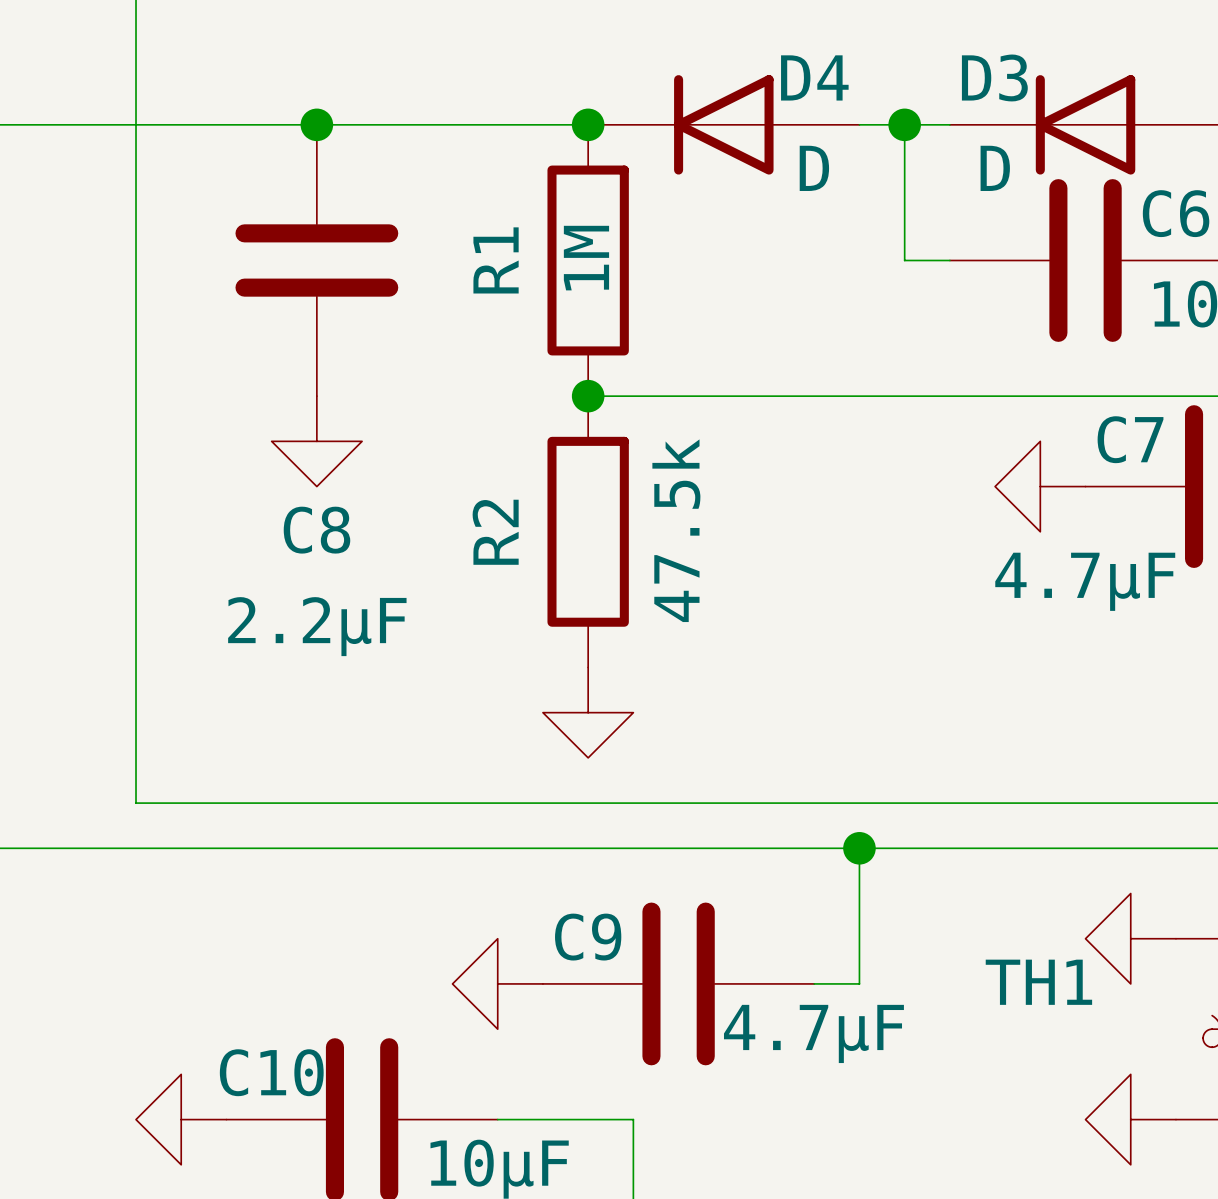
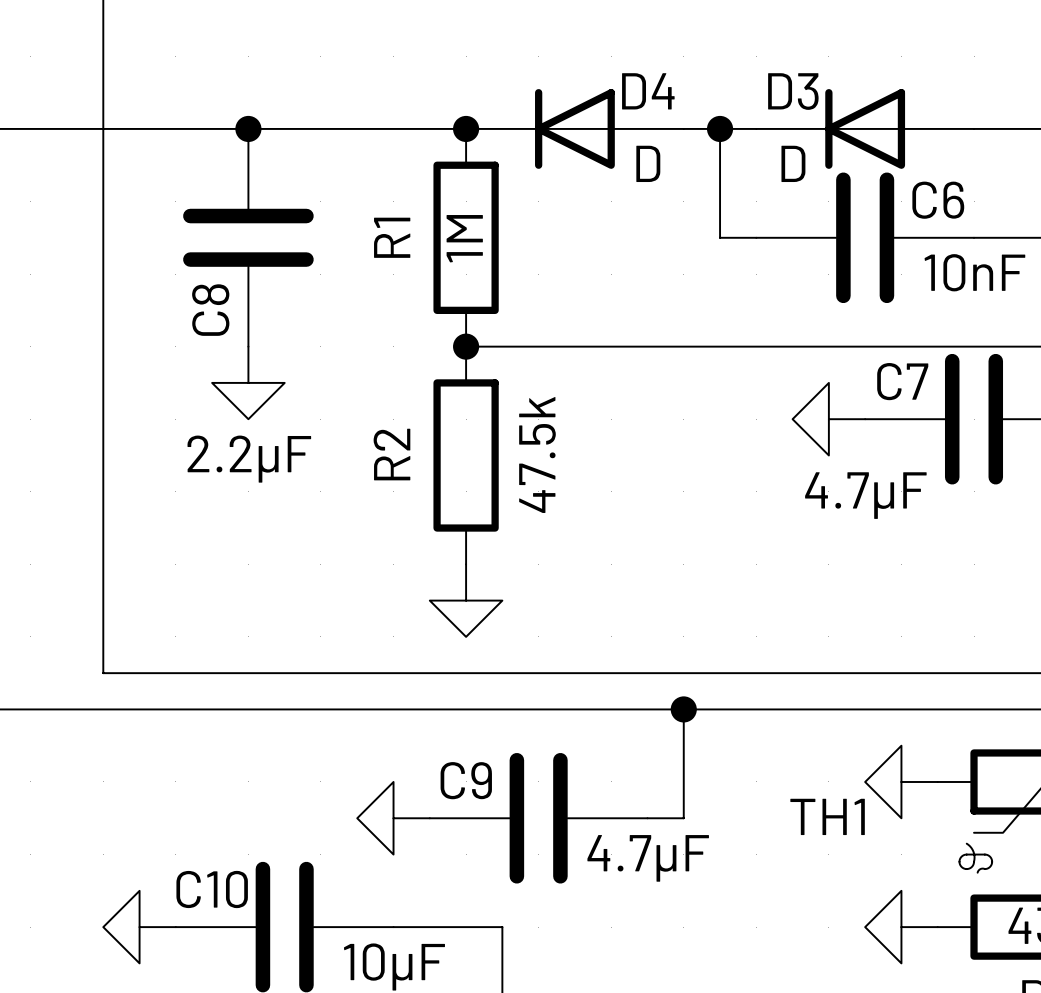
C8 name rotation: 0° (316, 530) -> 90° counterclockwise (210, 310)
C8 name position: C8 (316, 530) -> C8 (210, 310)
C8 value position: 2.2µF (317, 626) -> 2.2µF (249, 459)

